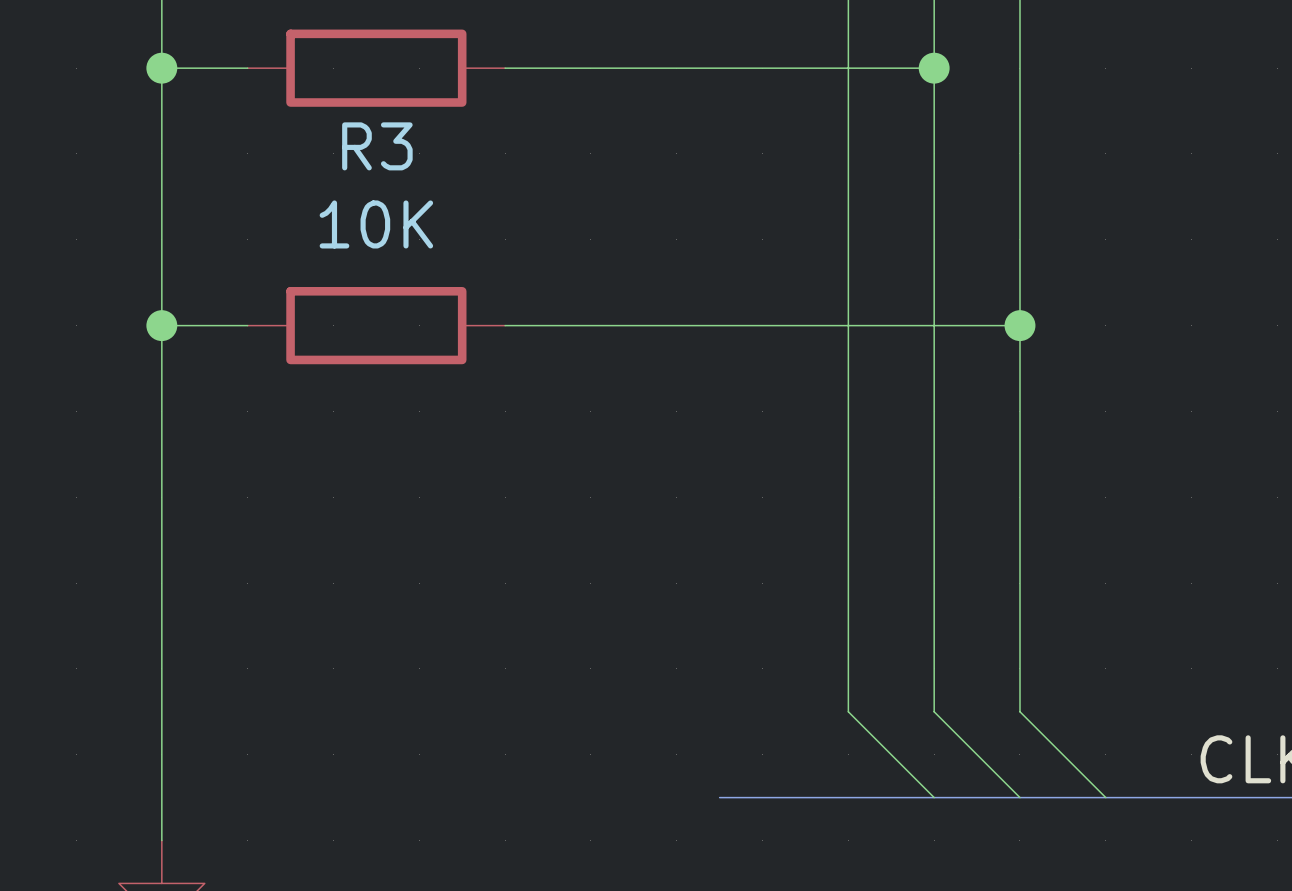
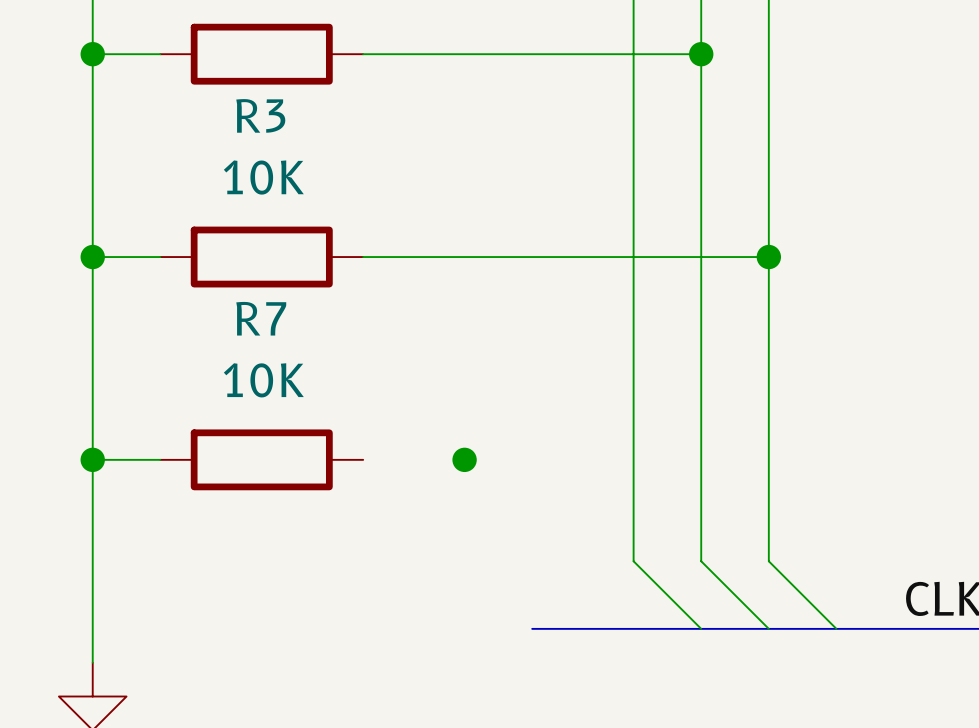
wire: none -> (92, 459) (160, 459)
junction: none -> (92, 459)
R7: none -> 10K (261, 459)
junction: none -> (464, 459)

